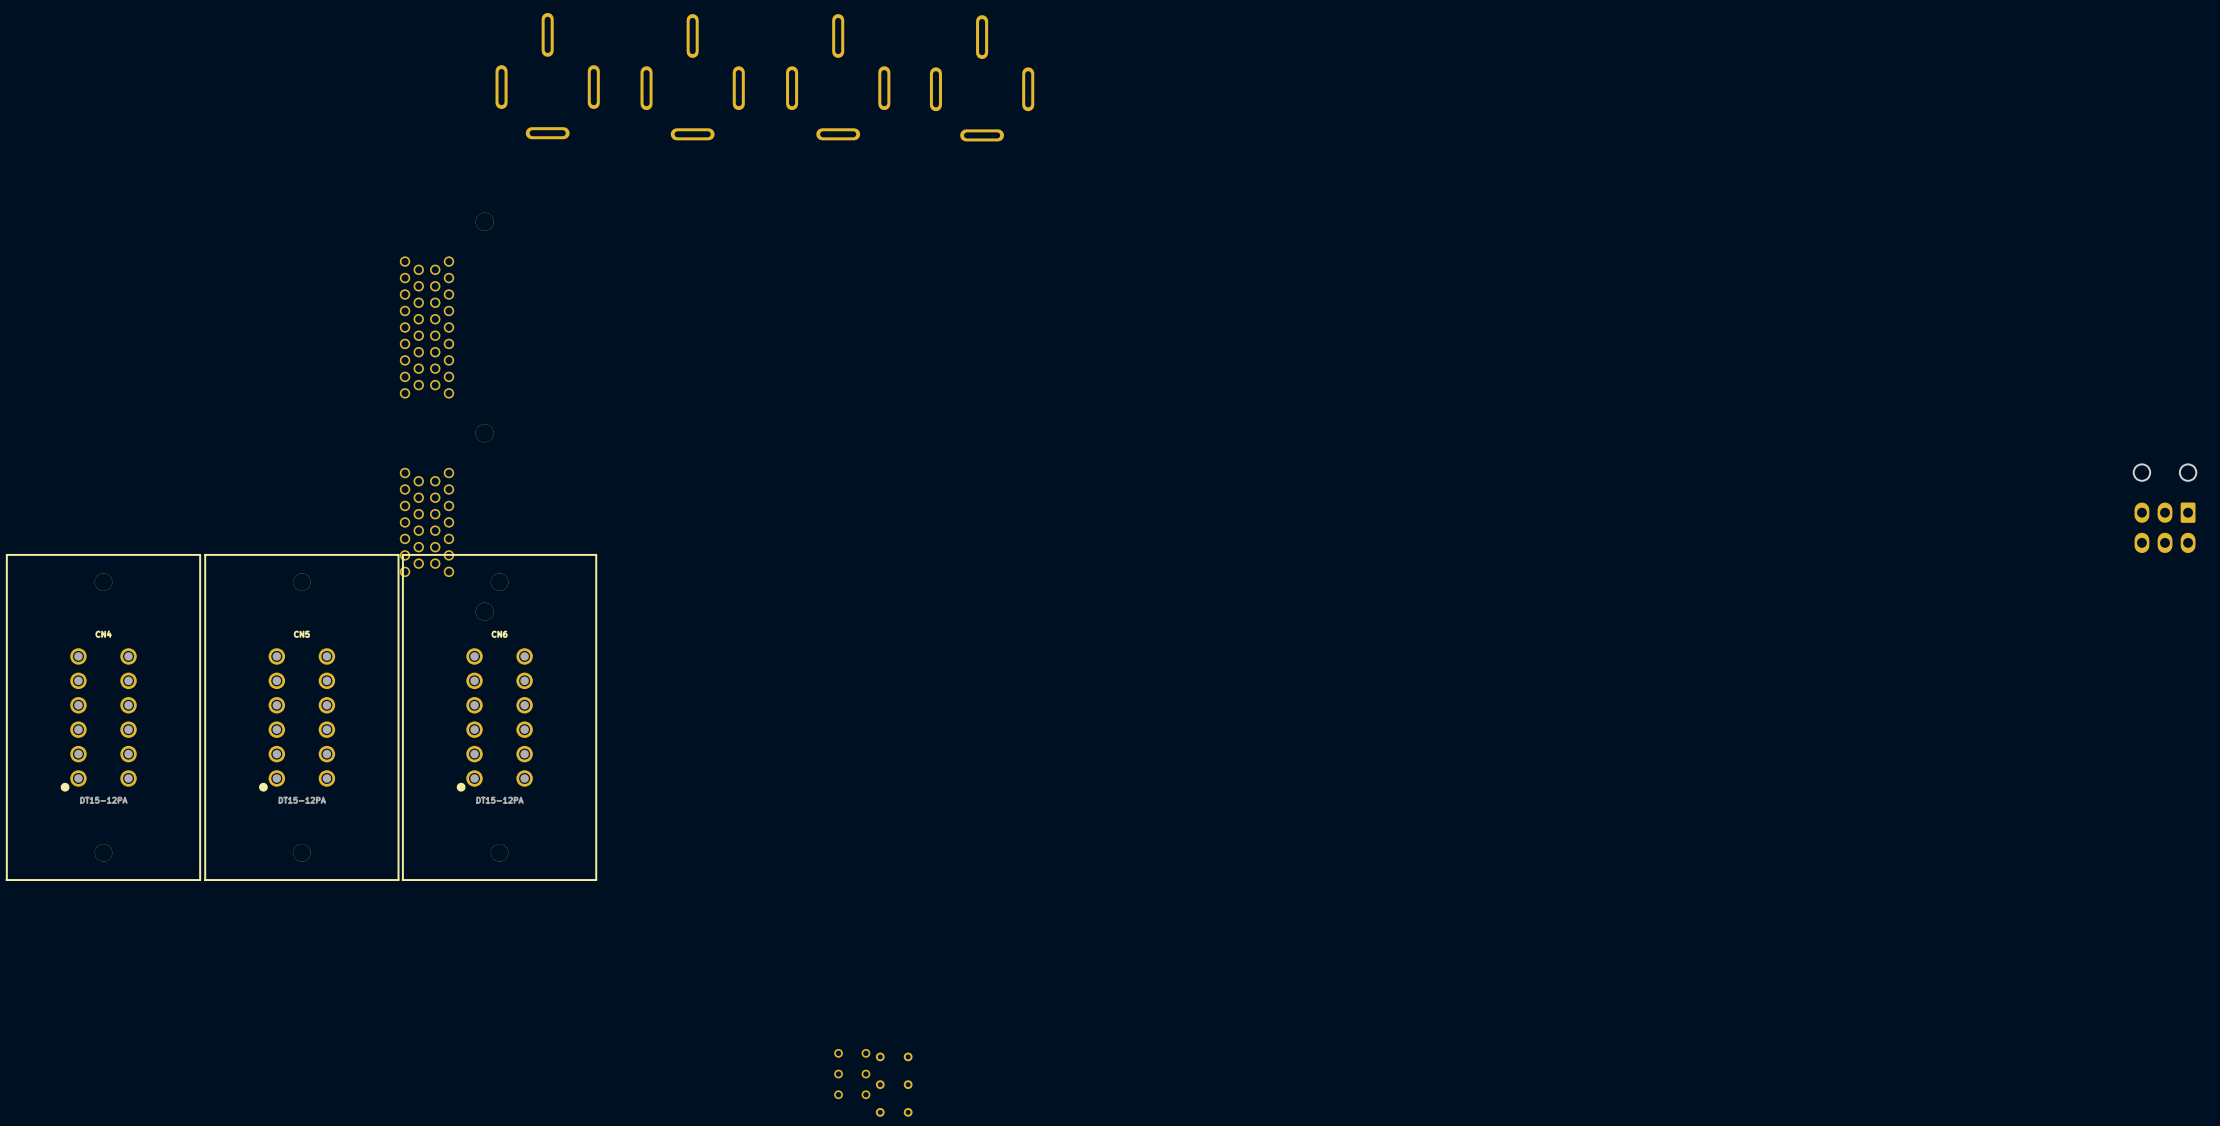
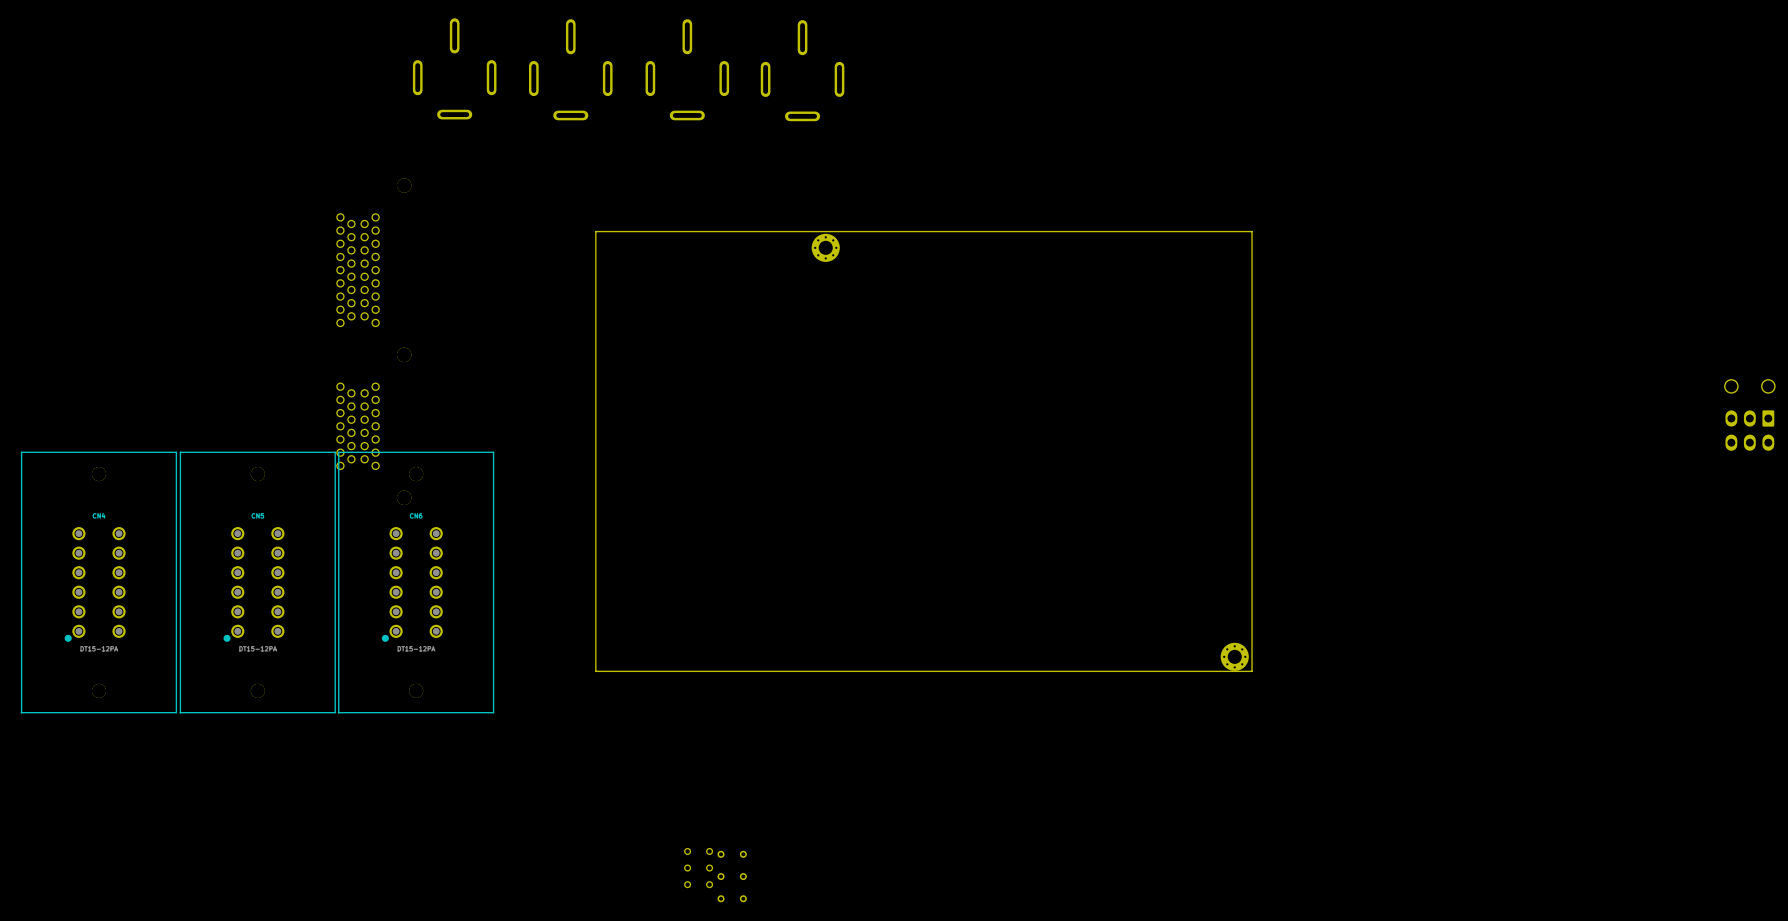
board edge: none -> (1252, 231) (595, 231) (595, 671) (1252, 671) (1252, 231)
part: none -> (825, 247)
part: none -> (1234, 656)

